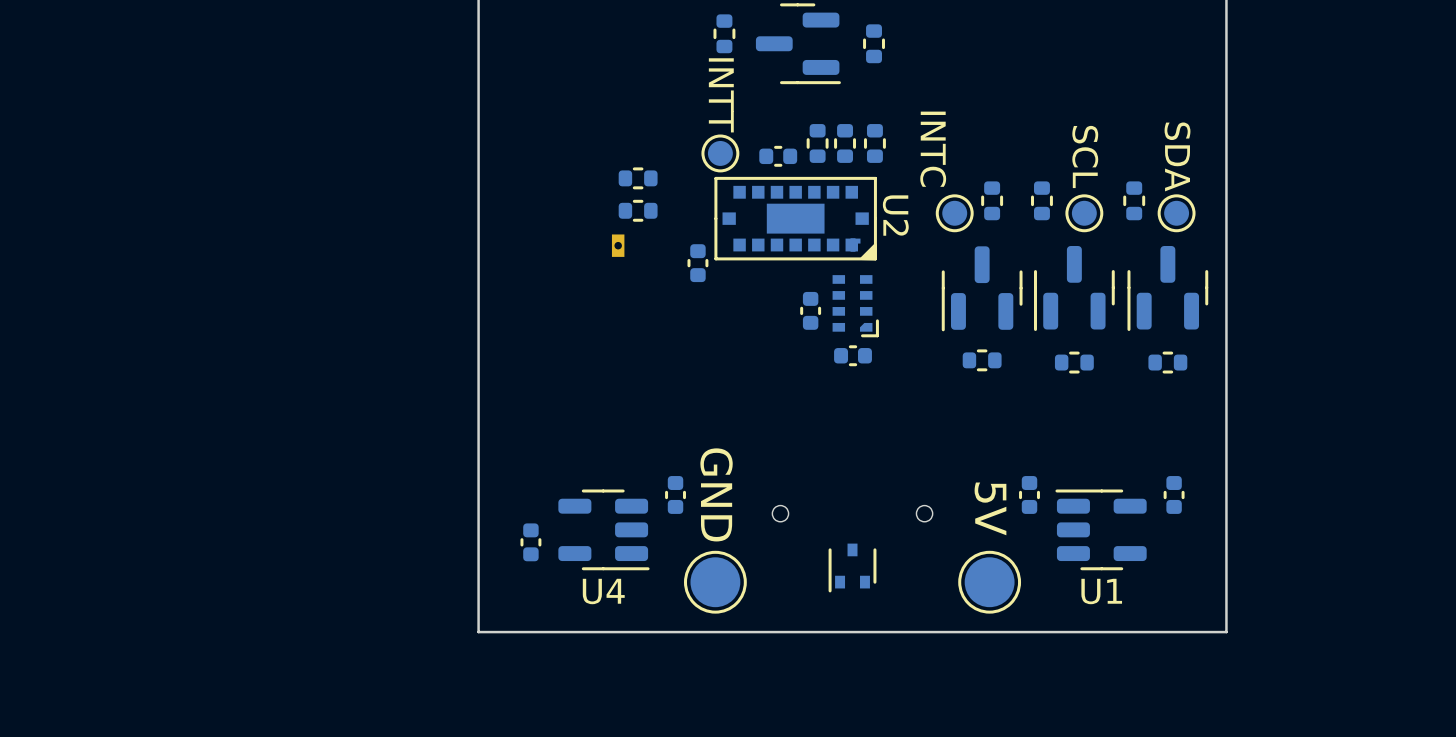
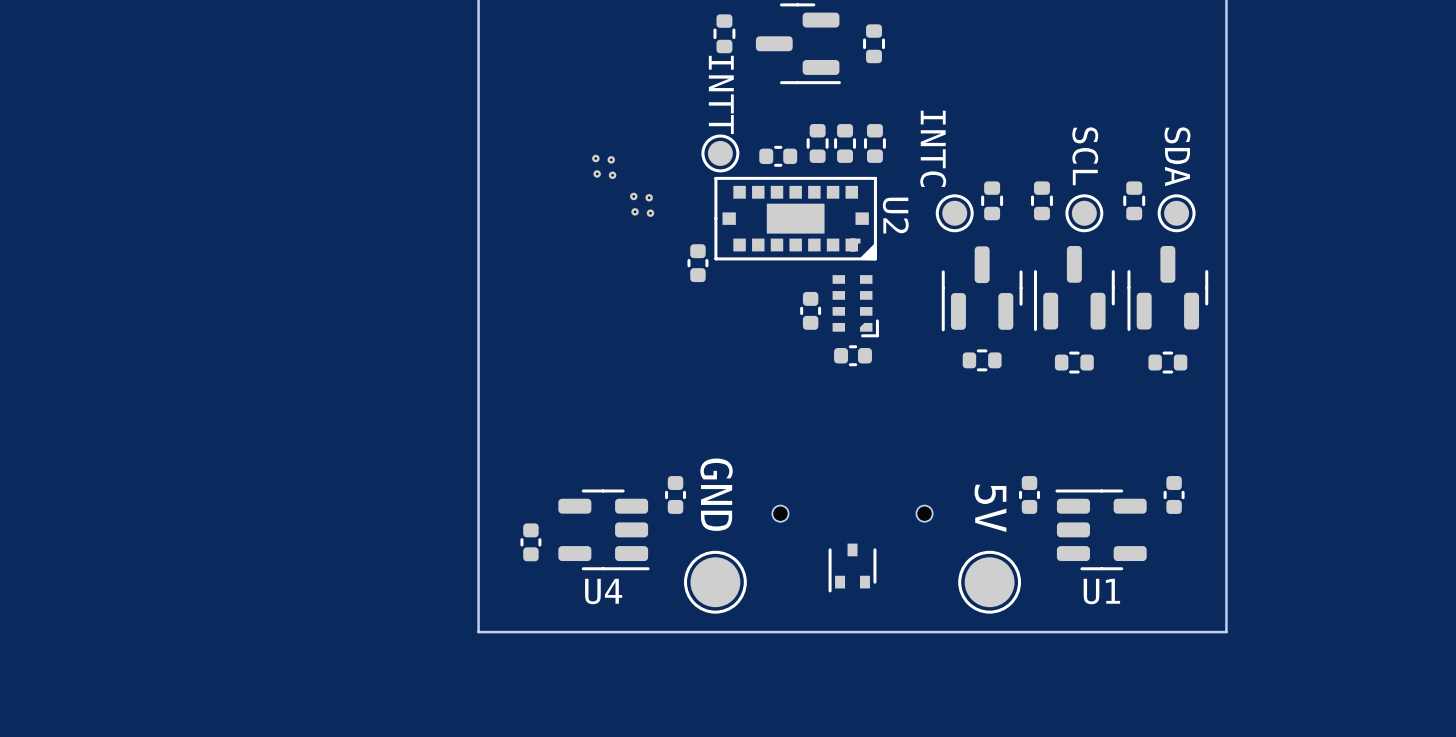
part: (638, 178) -> none
part: none -> (623, 185)
part: (638, 210) -> none
part: (618, 245) -> none

